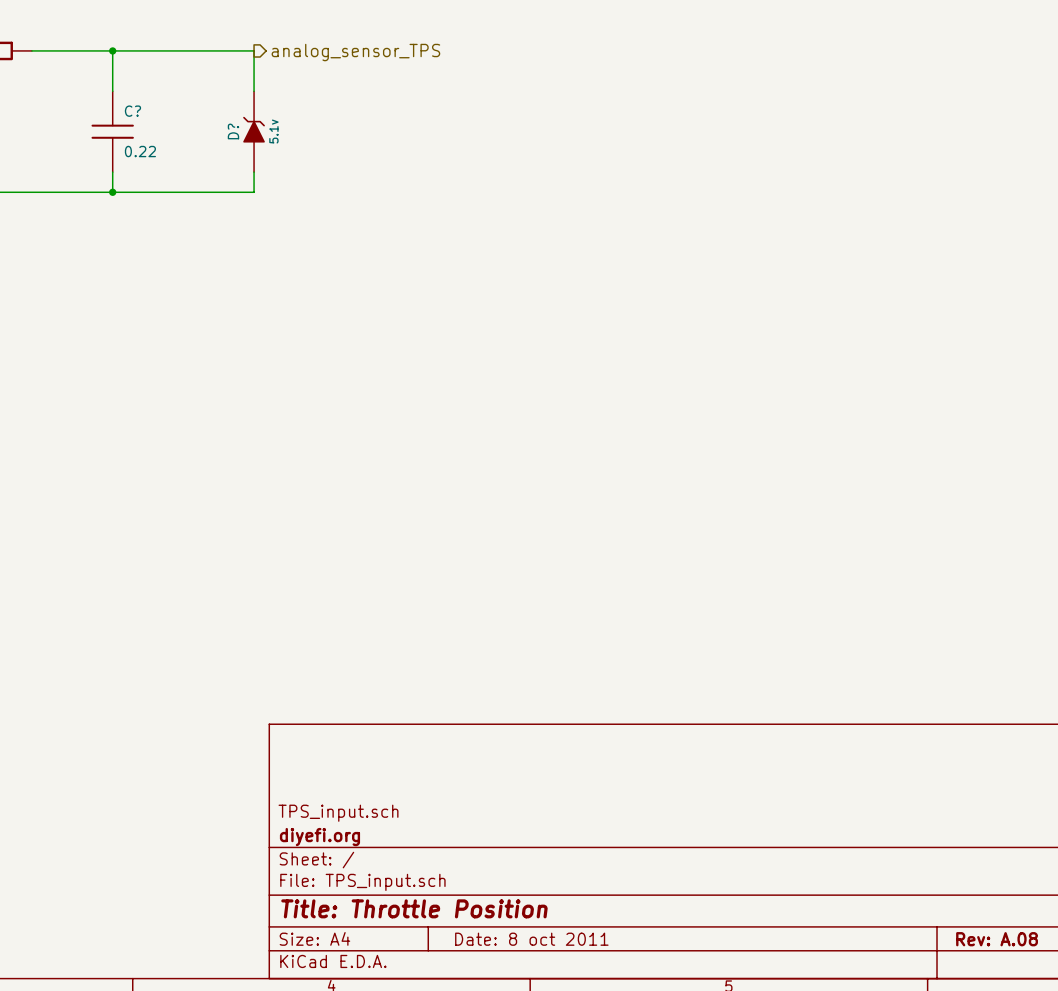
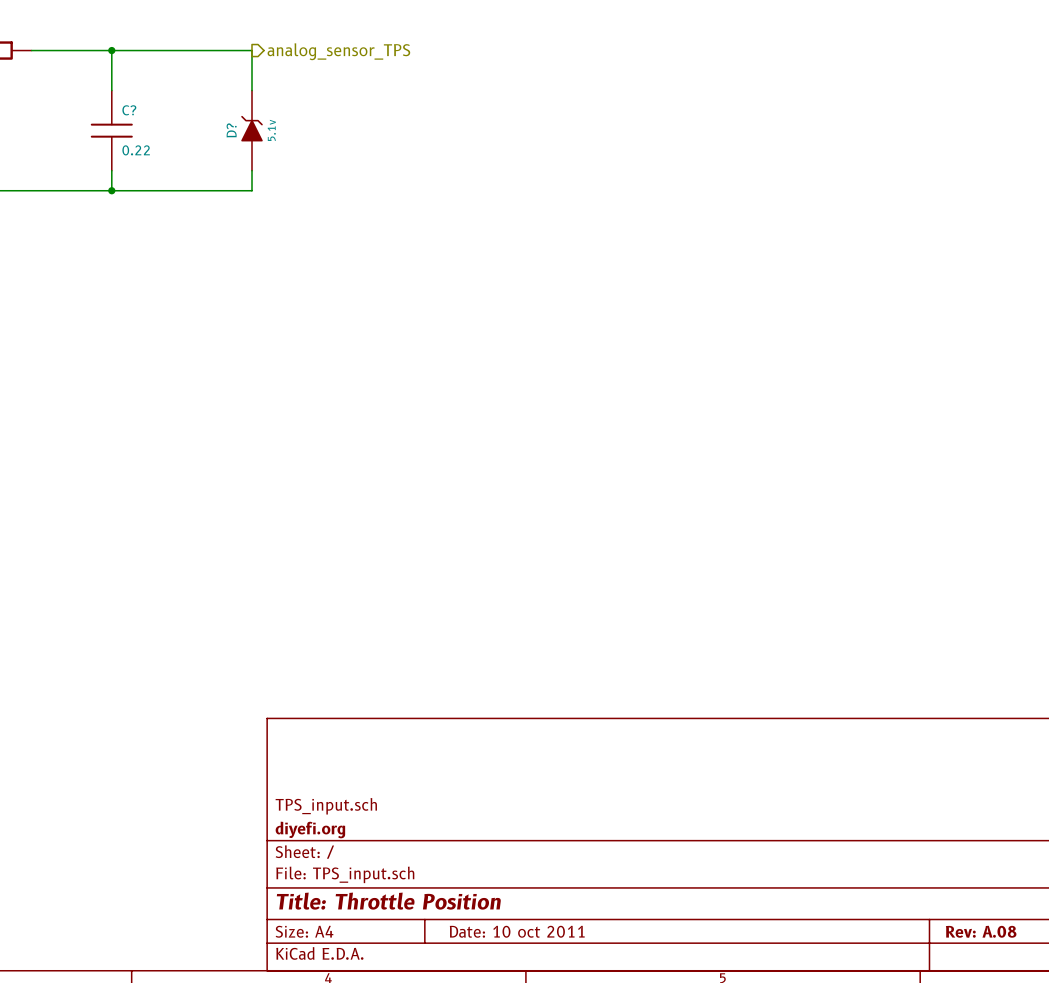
title block: Date: 8 oct 2011 (531, 939) -> Date: 10 oct 2011 (517, 931)

